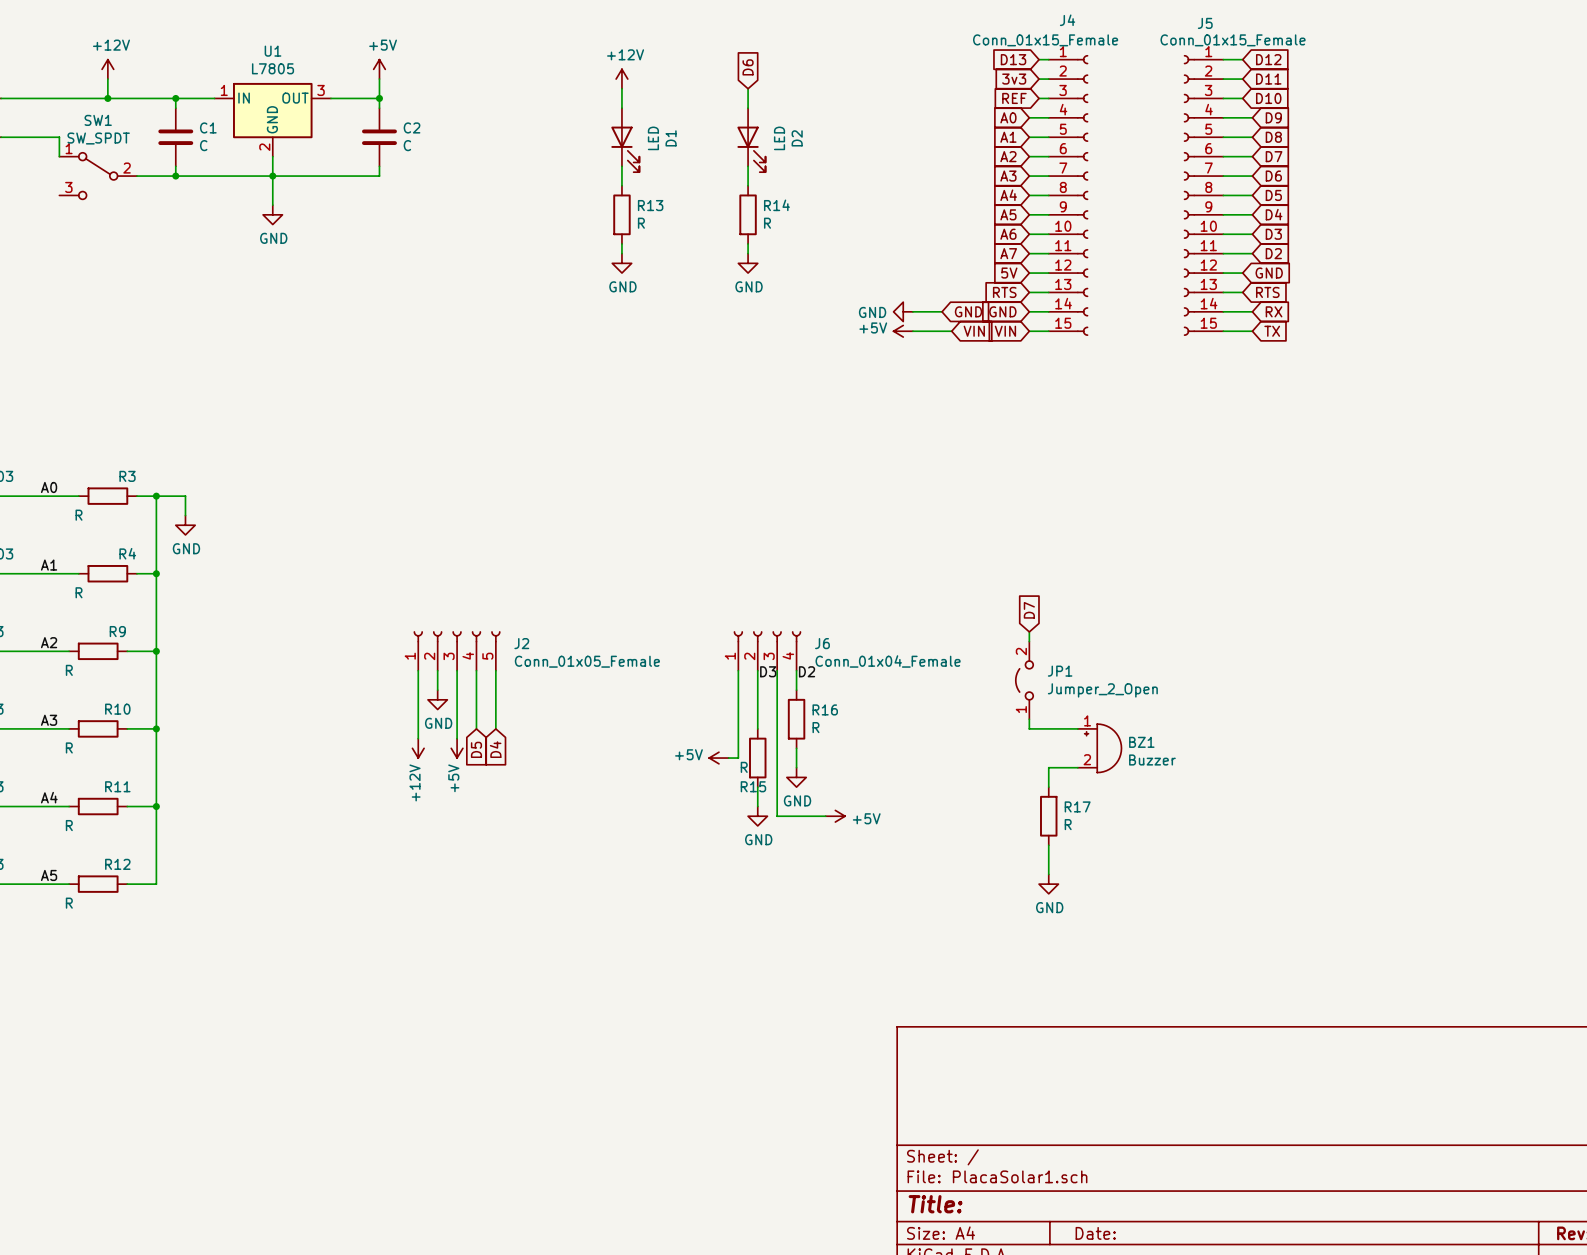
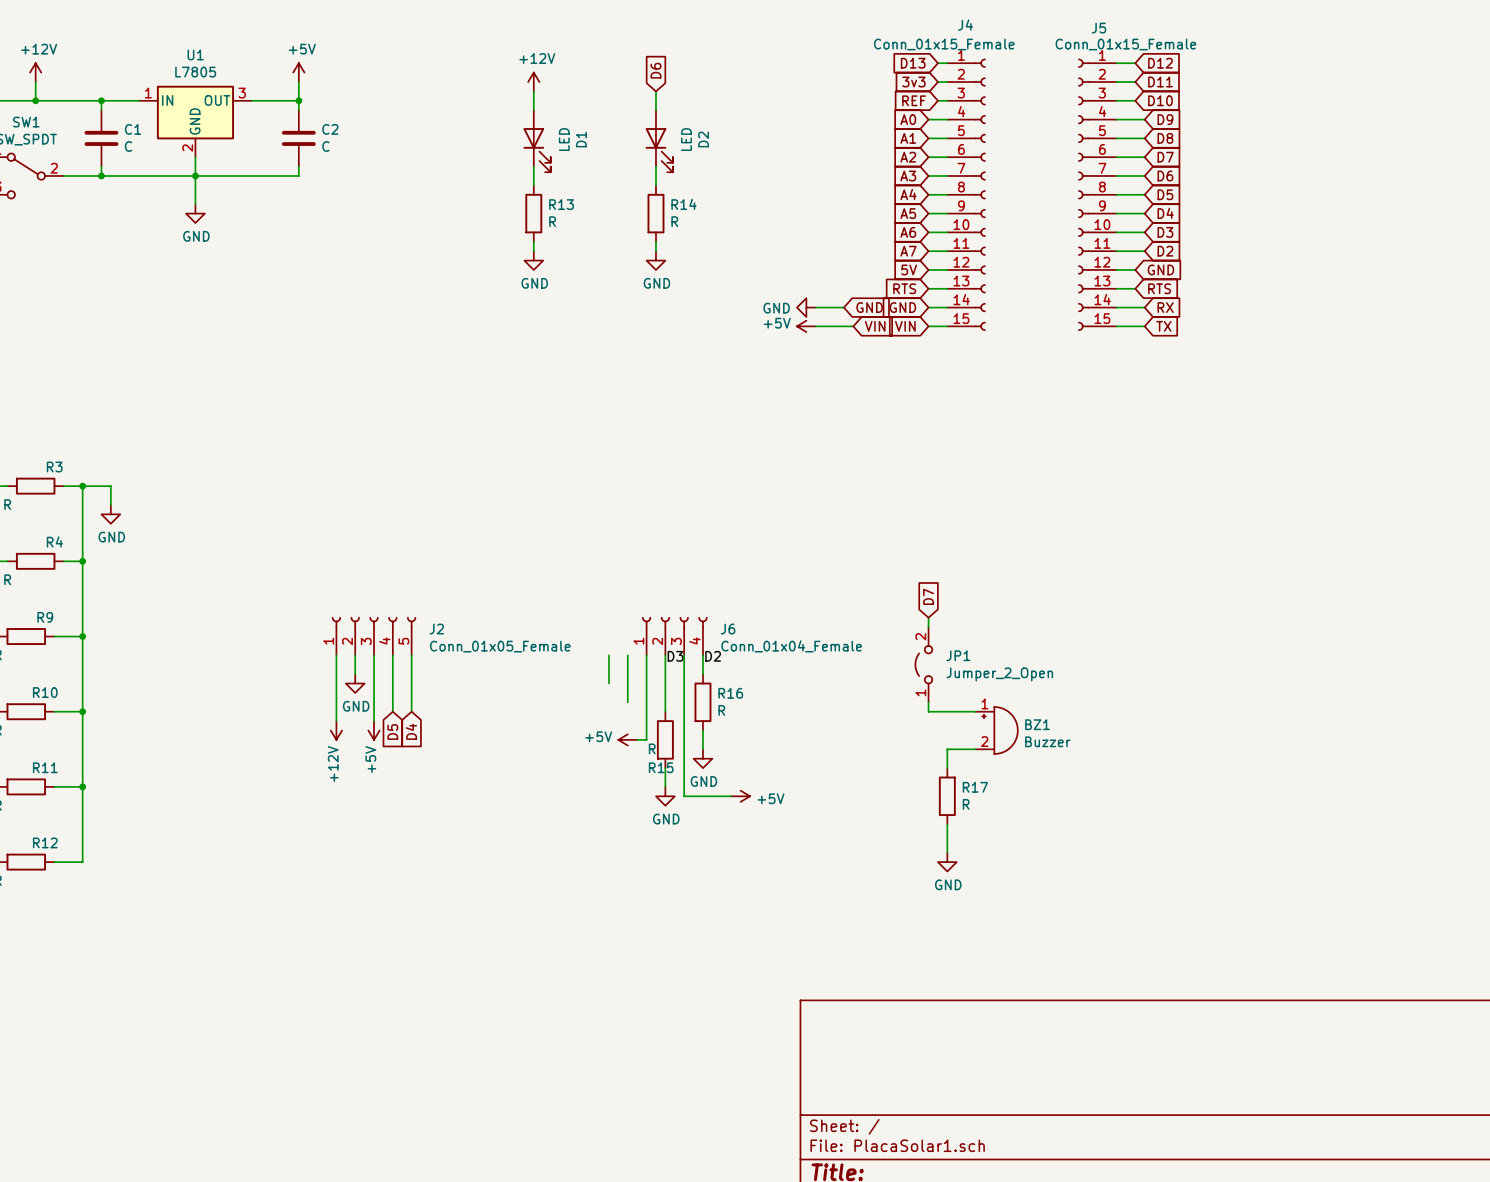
wire: none -> (608, 655) (608, 683)
wire: none -> (627, 655) (627, 702)

